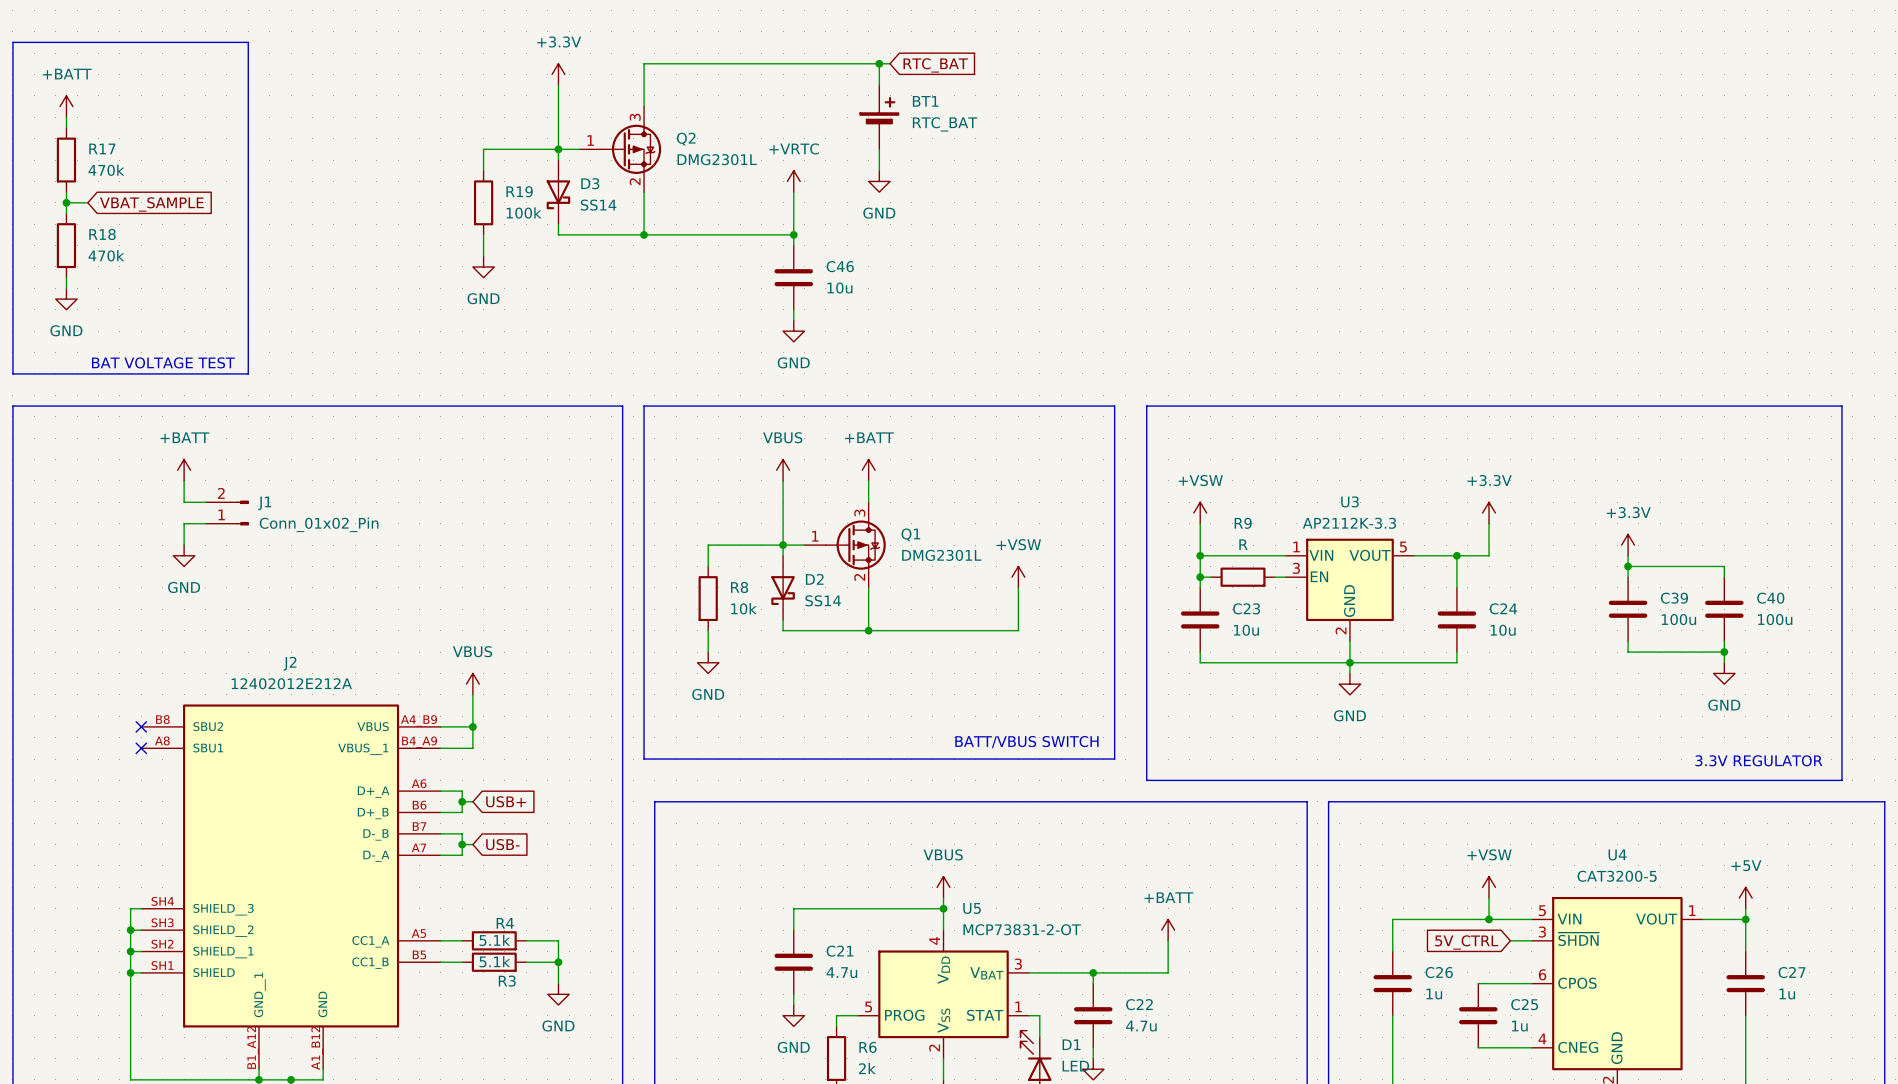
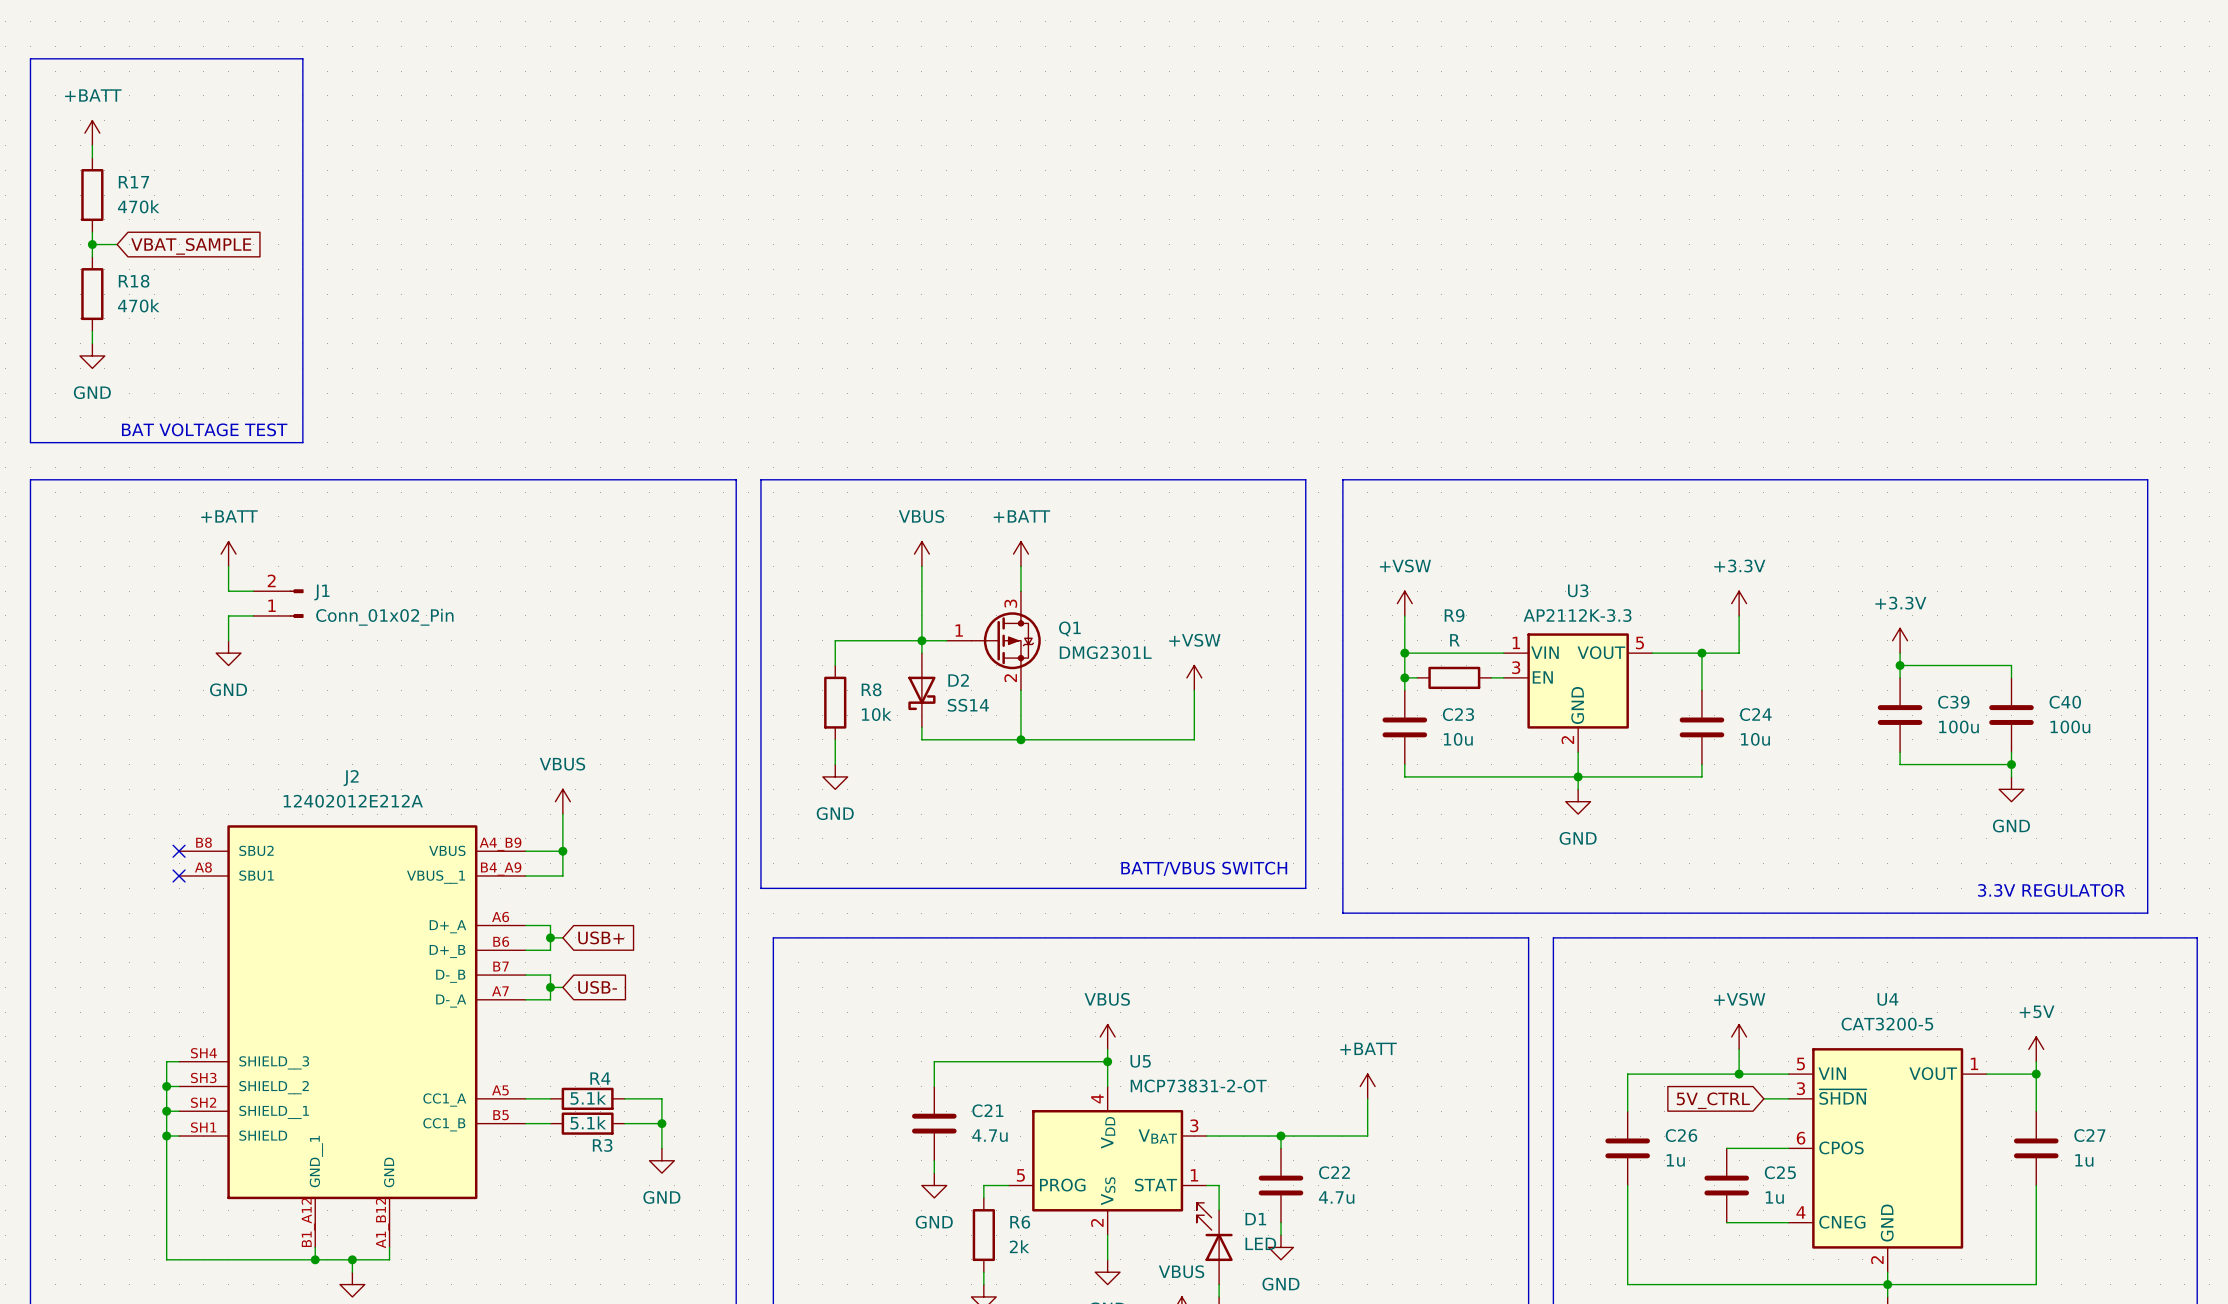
wire: (879, 63) (879, 85) -> none
junction: (879, 63) -> none
wire: (890, 63) (644, 63) (644, 106) -> none
global label: RTC_BAT (935, 65) -> none
power symbol: +3.3V (558, 74) -> none
wire: (558, 85) (558, 160) -> none
BT1: RTC_BAT (879, 117) -> none
junction: (558, 149) -> none
wire: (579, 149) (483, 149) (483, 170) -> none
Q2: DMG2301L (620, 149) -> none
wire: (879, 149) (879, 170) -> none
power symbol: +VRTC (793, 181) -> none
power symbol: GND (879, 181) -> none
D3: SS14 (558, 192) -> none
wire: (644, 192) (644, 234) -> none
wire: (793, 192) (793, 245) -> none
R19: 100k (483, 202) -> none
wire: (558, 224) (558, 234) (793, 234) -> none
wire: (483, 234) (483, 256) -> none
junction: (644, 234) -> none
junction: (793, 234) -> none
power symbol: GND (483, 266) -> none
C46: 10u (793, 277) -> none
wire: (793, 309) (793, 320) -> none
power symbol: GND (793, 331) -> none

